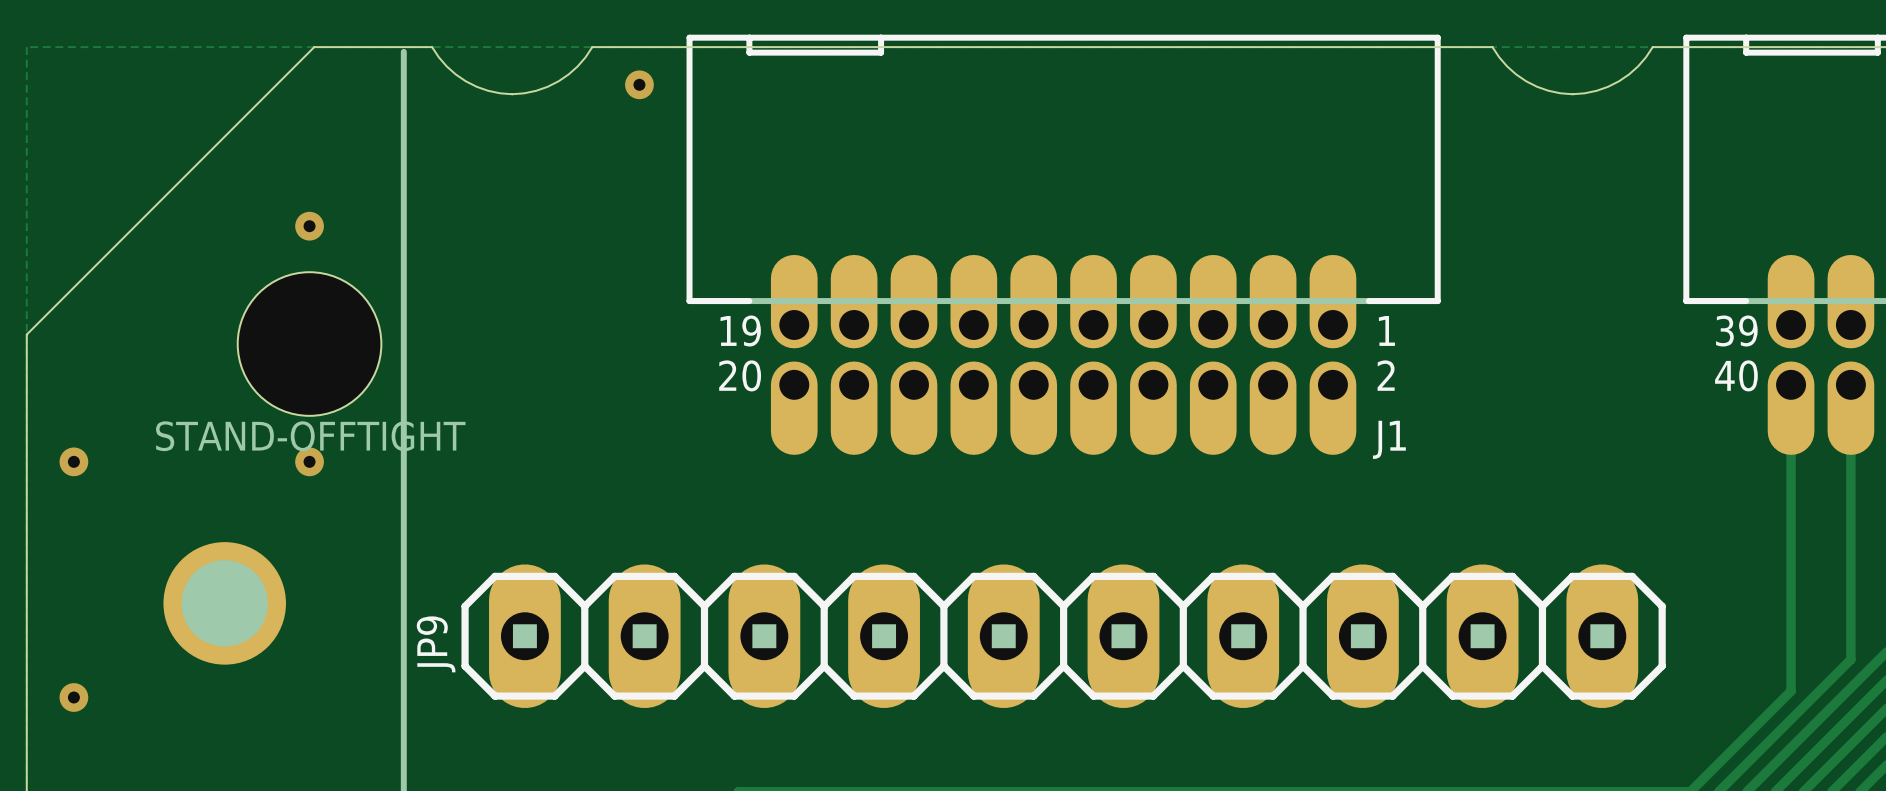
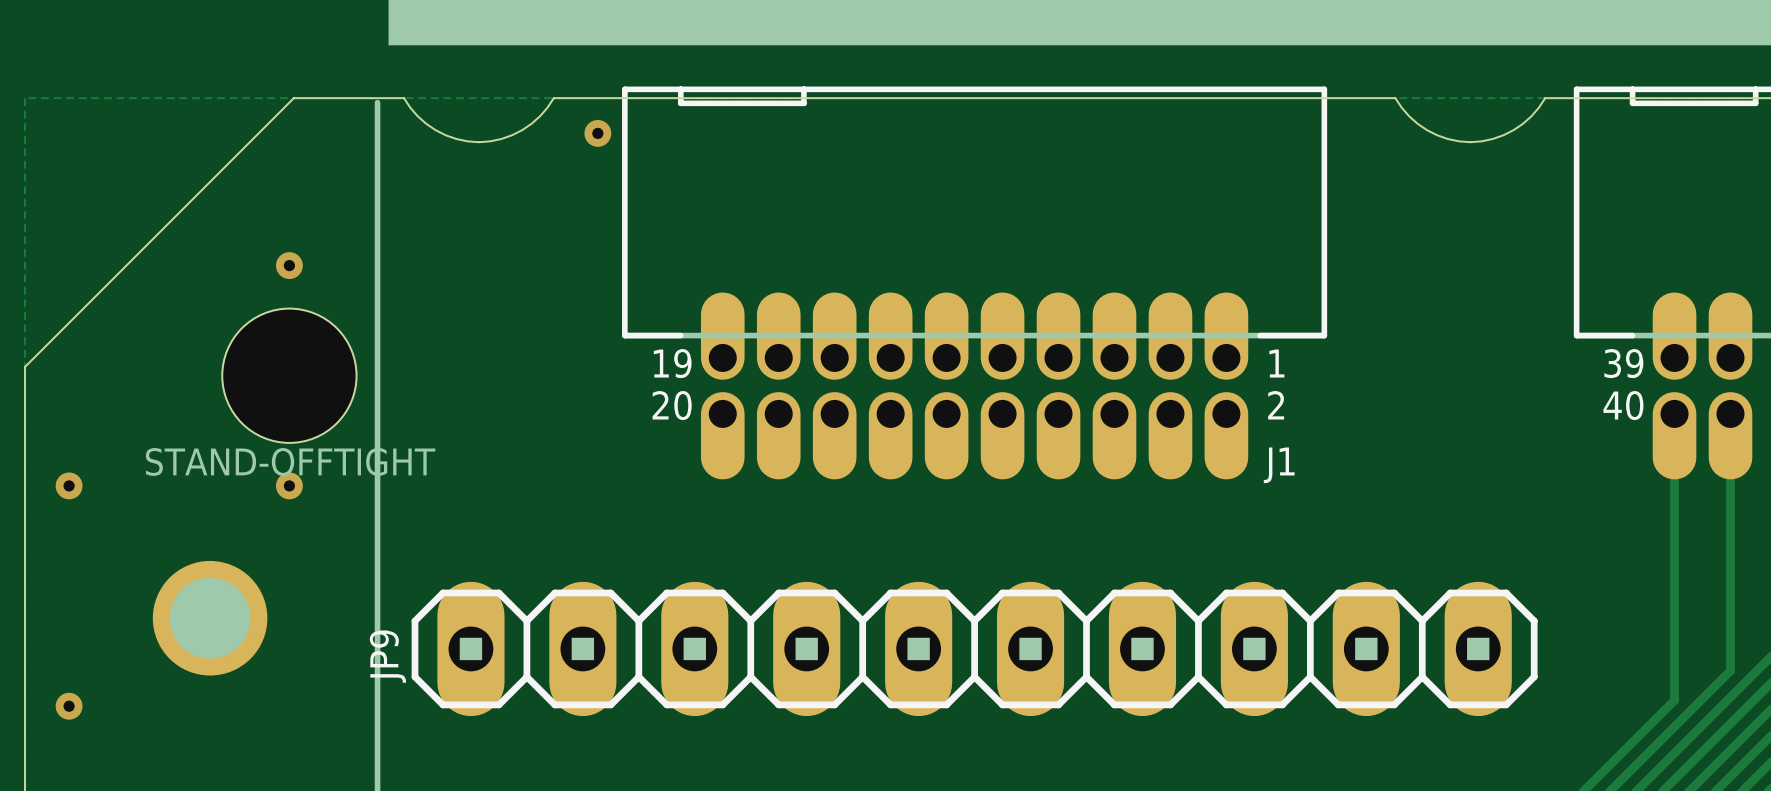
J1 position: (1063, 244) -> (974, 282)
JP9 position: (1063, 636) -> (974, 648)

